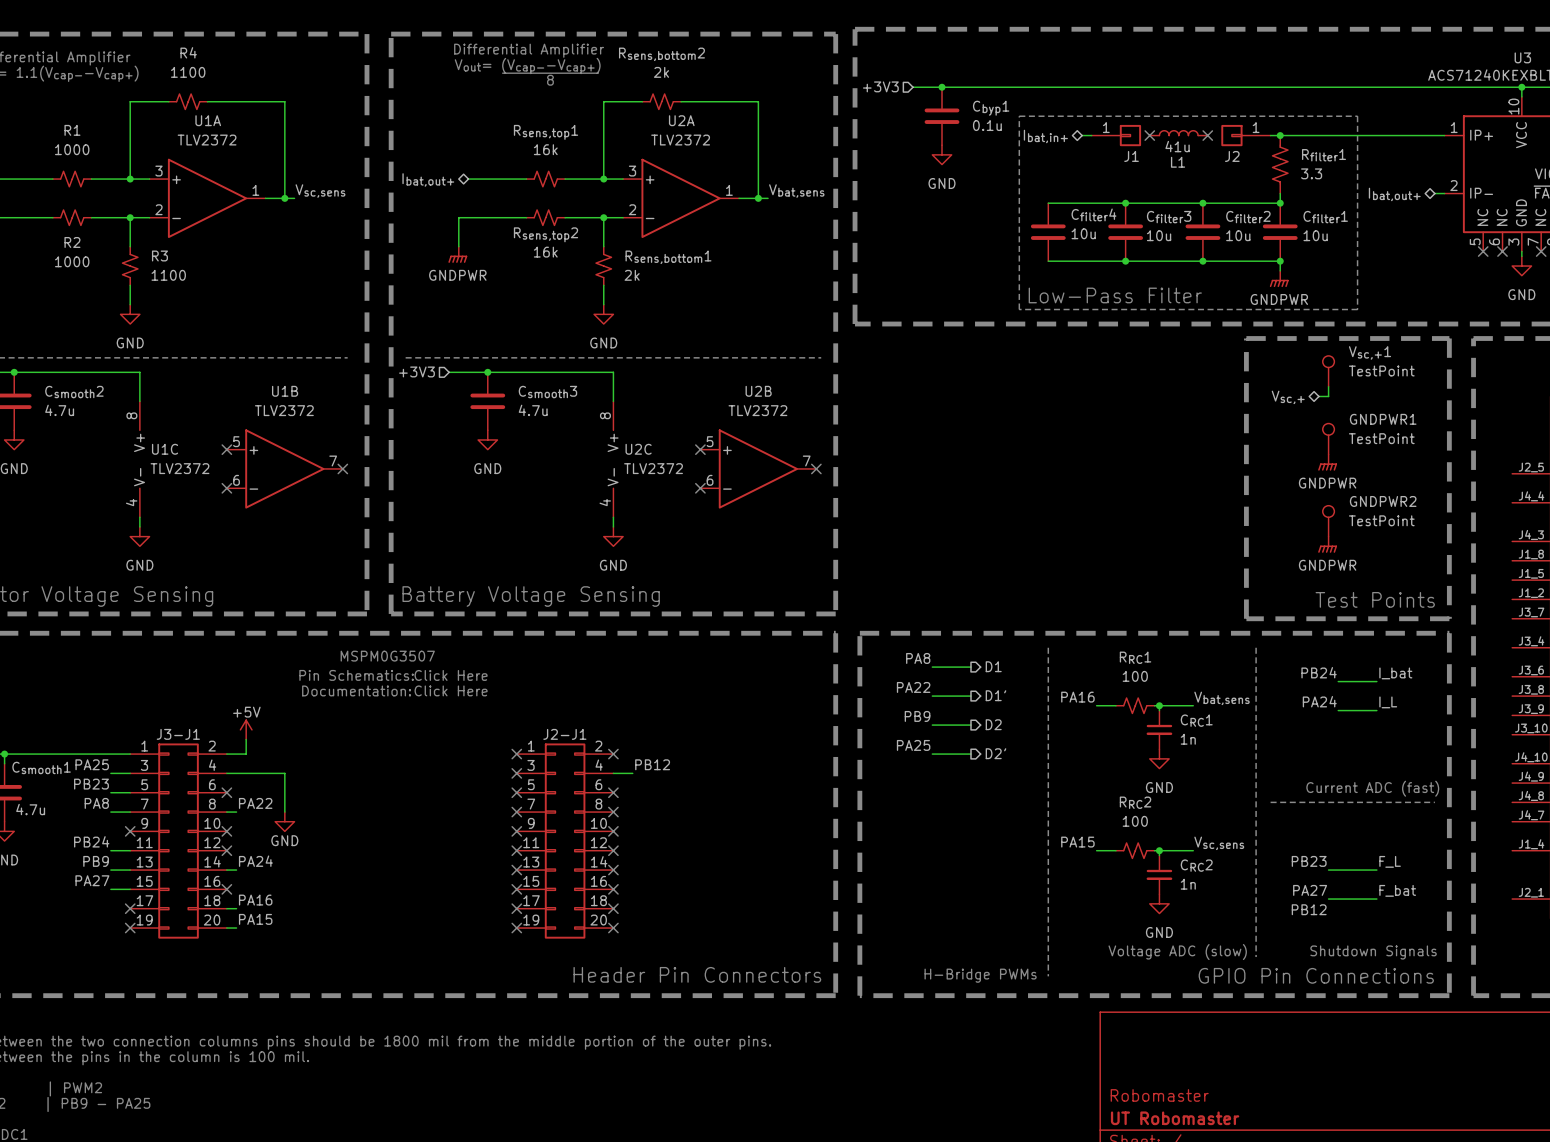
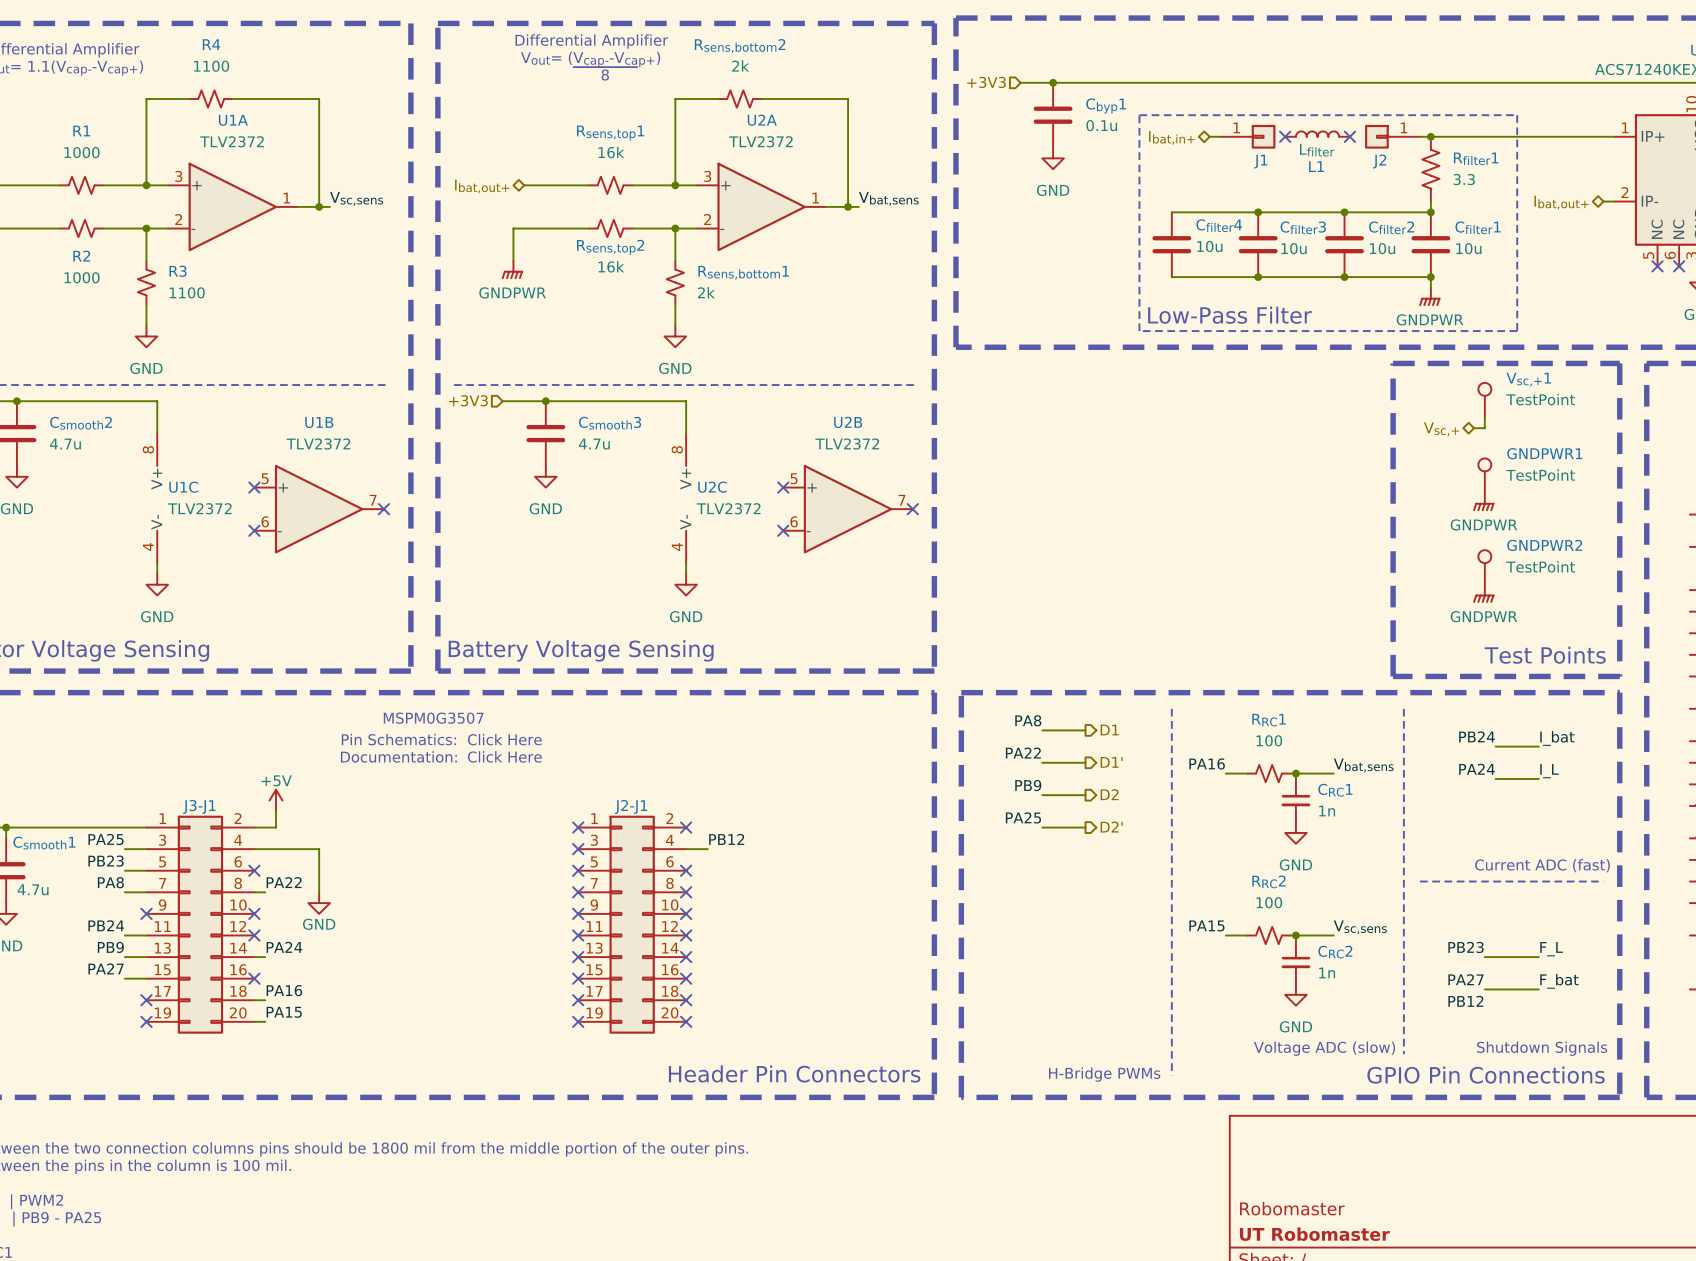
L1 value: 41u (1177, 146) -> Lfilter (1317, 150)

